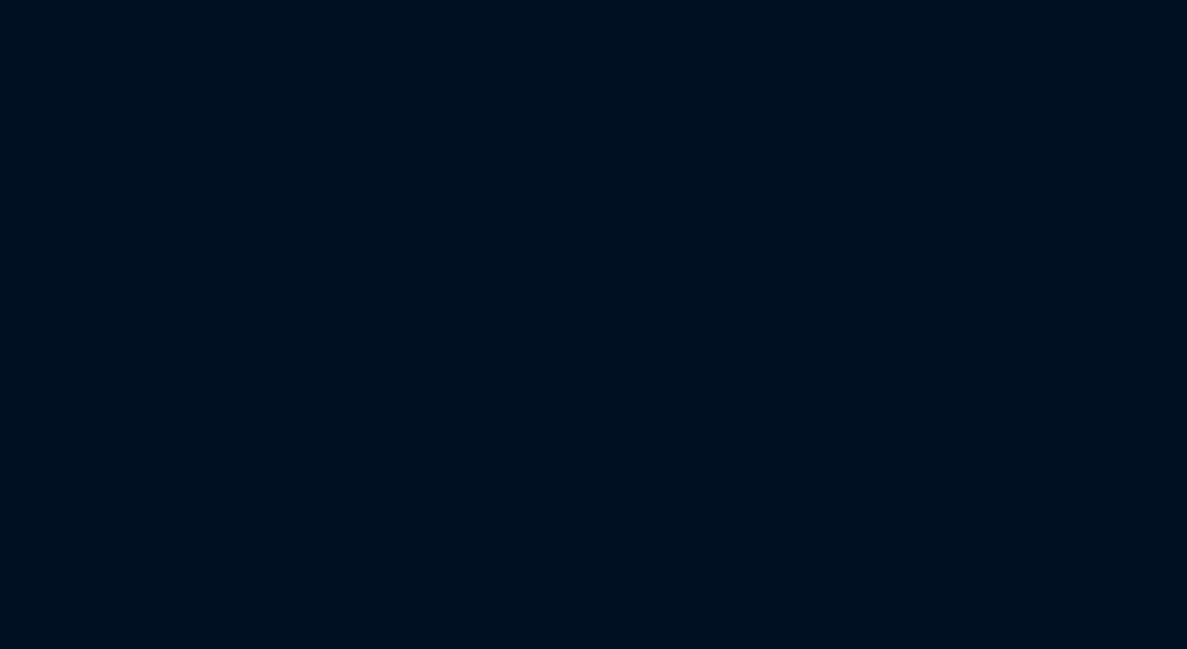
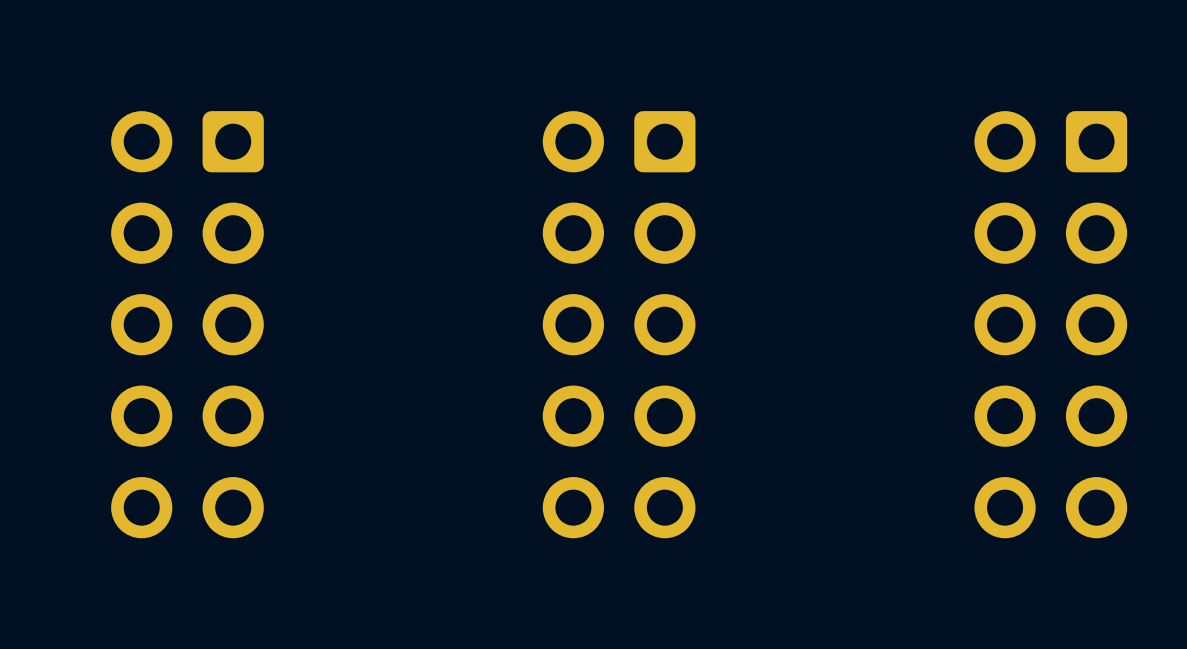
part: none -> (187, 324)
part: none -> (619, 324)
part: none -> (1050, 324)

